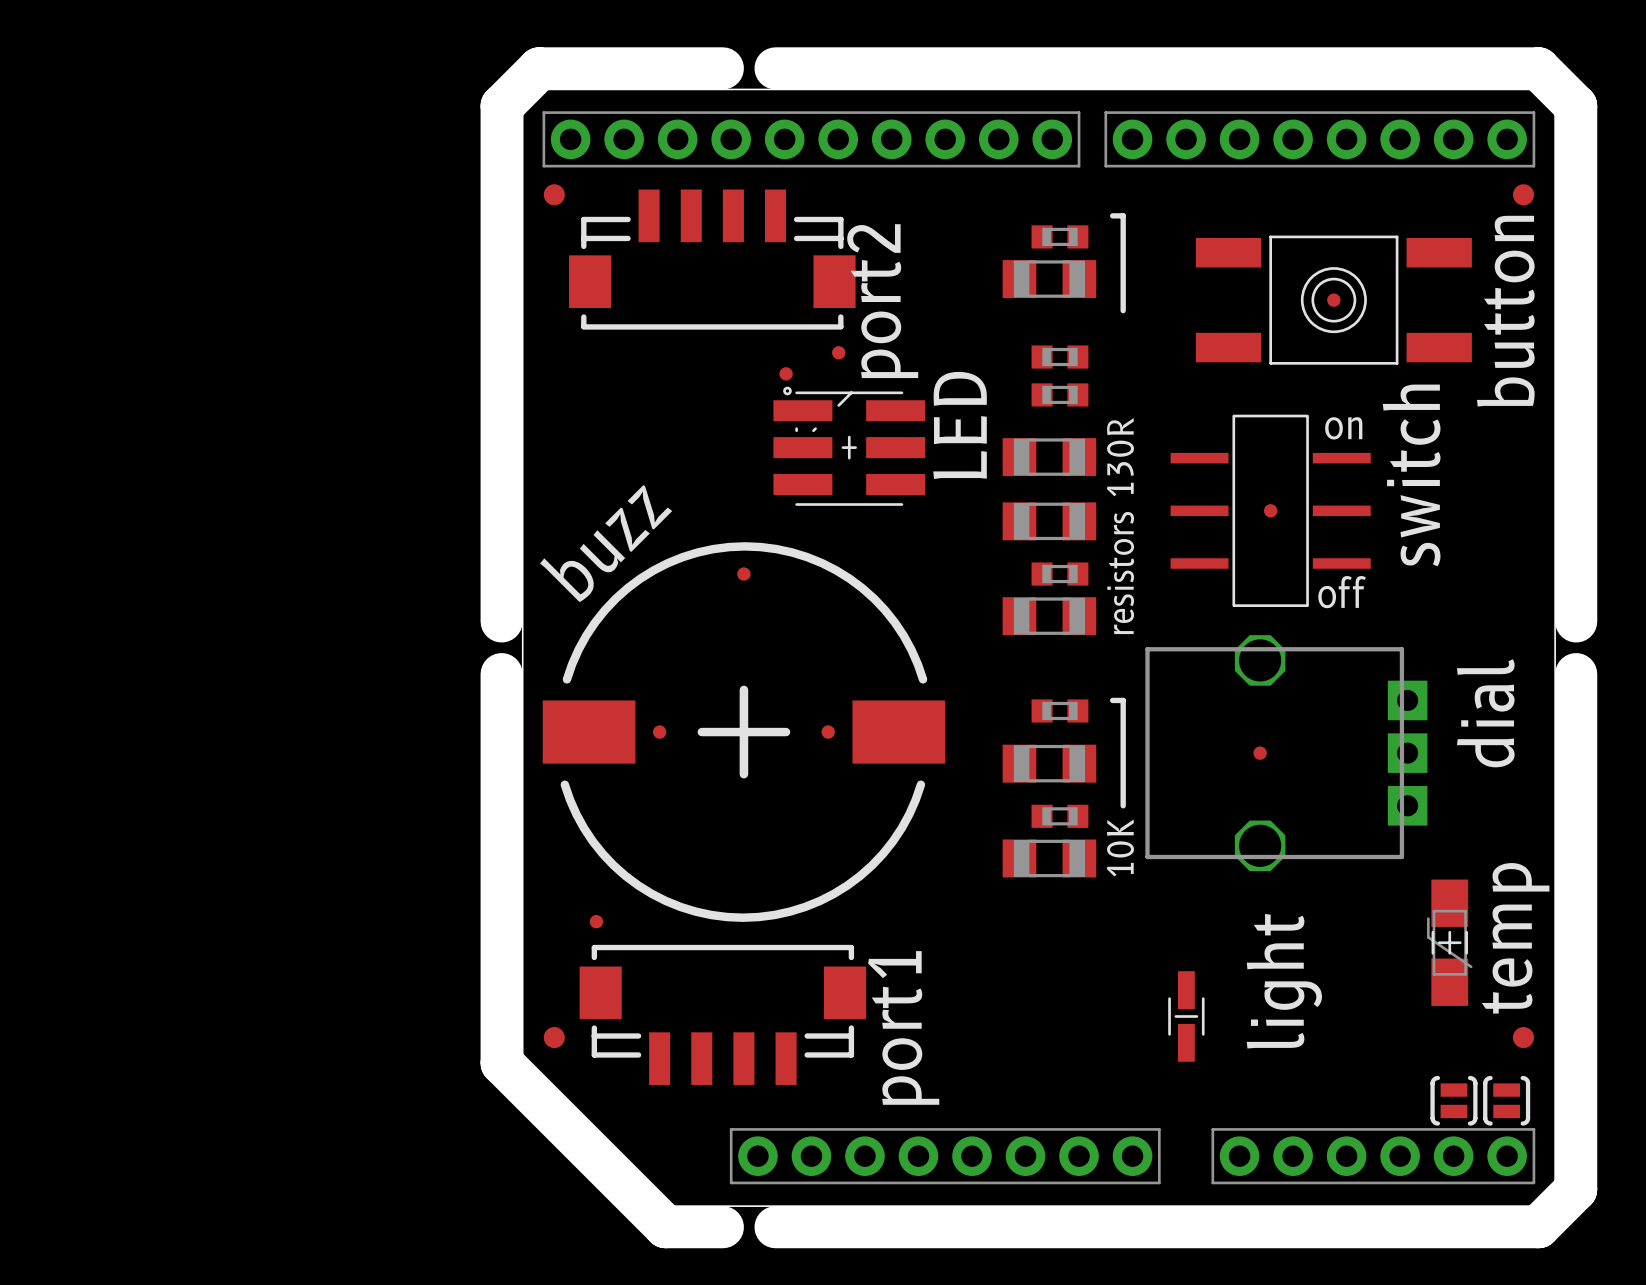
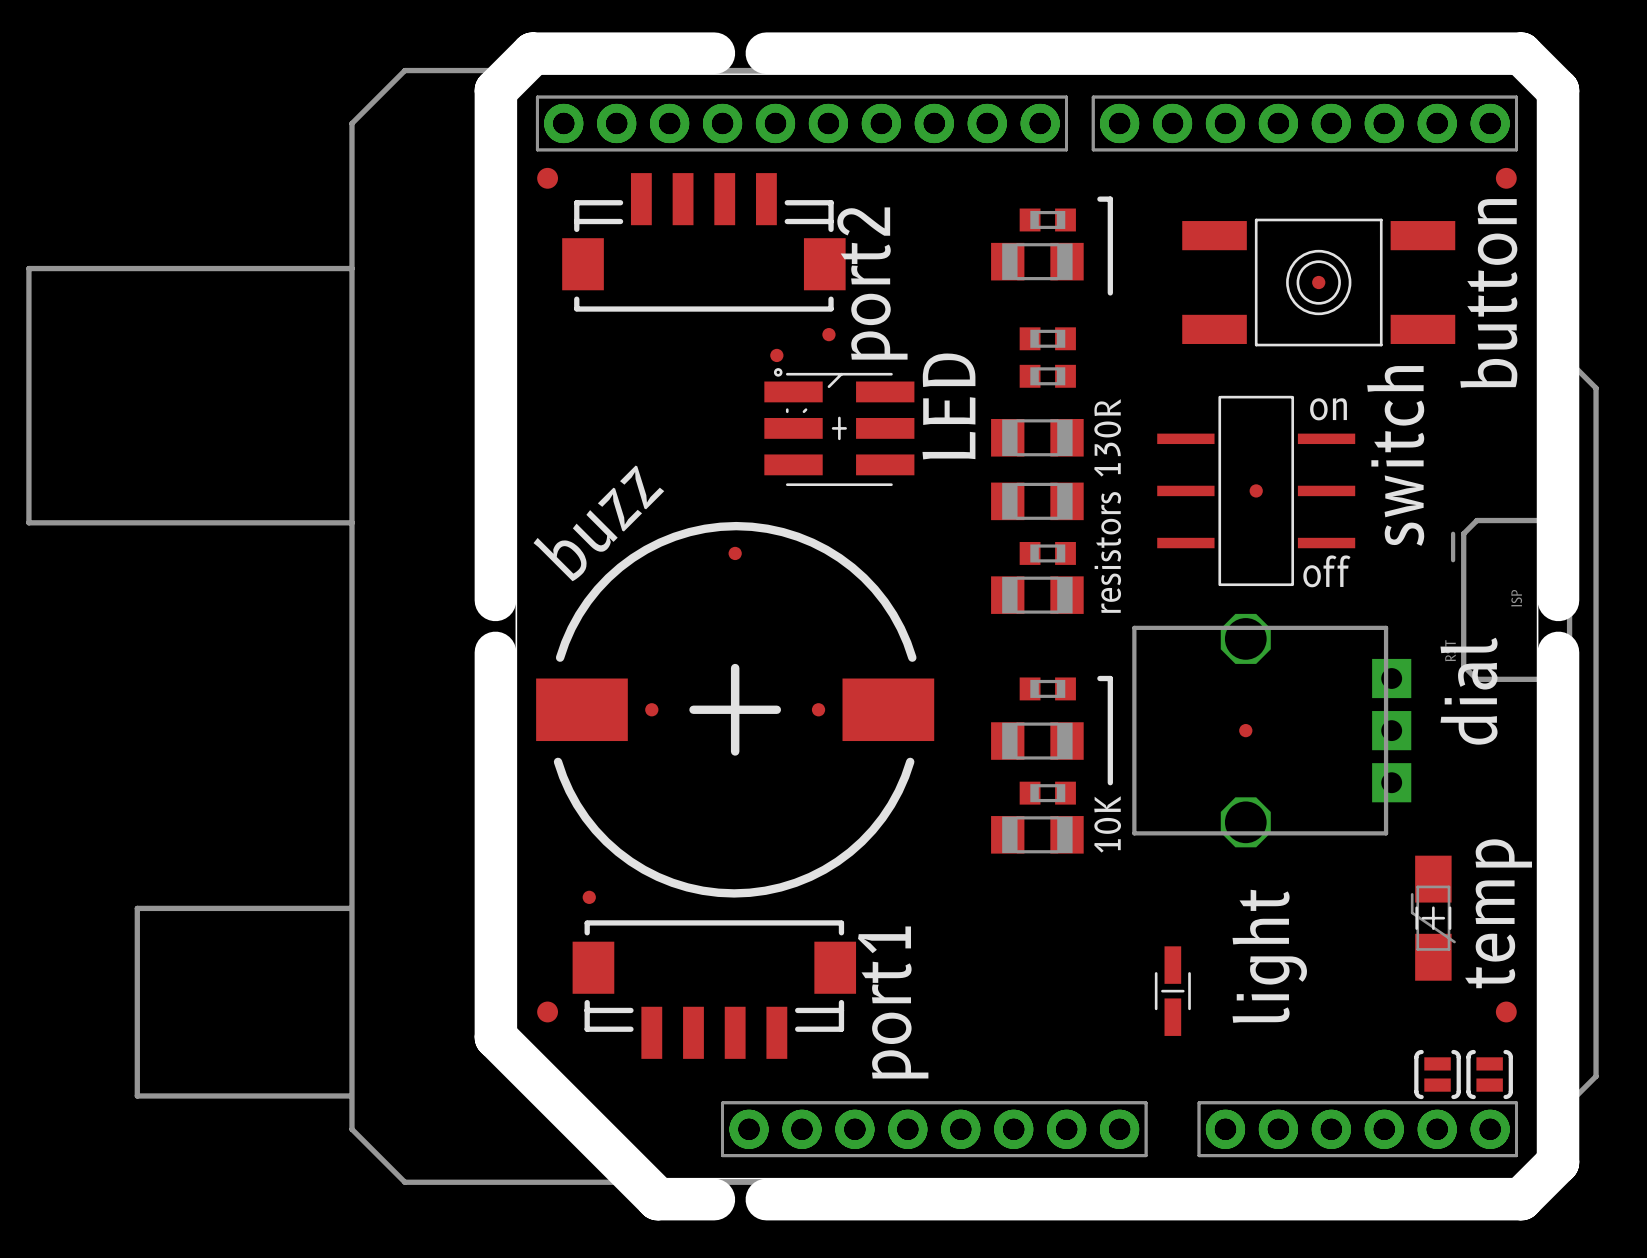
part: none -> (812, 626)

